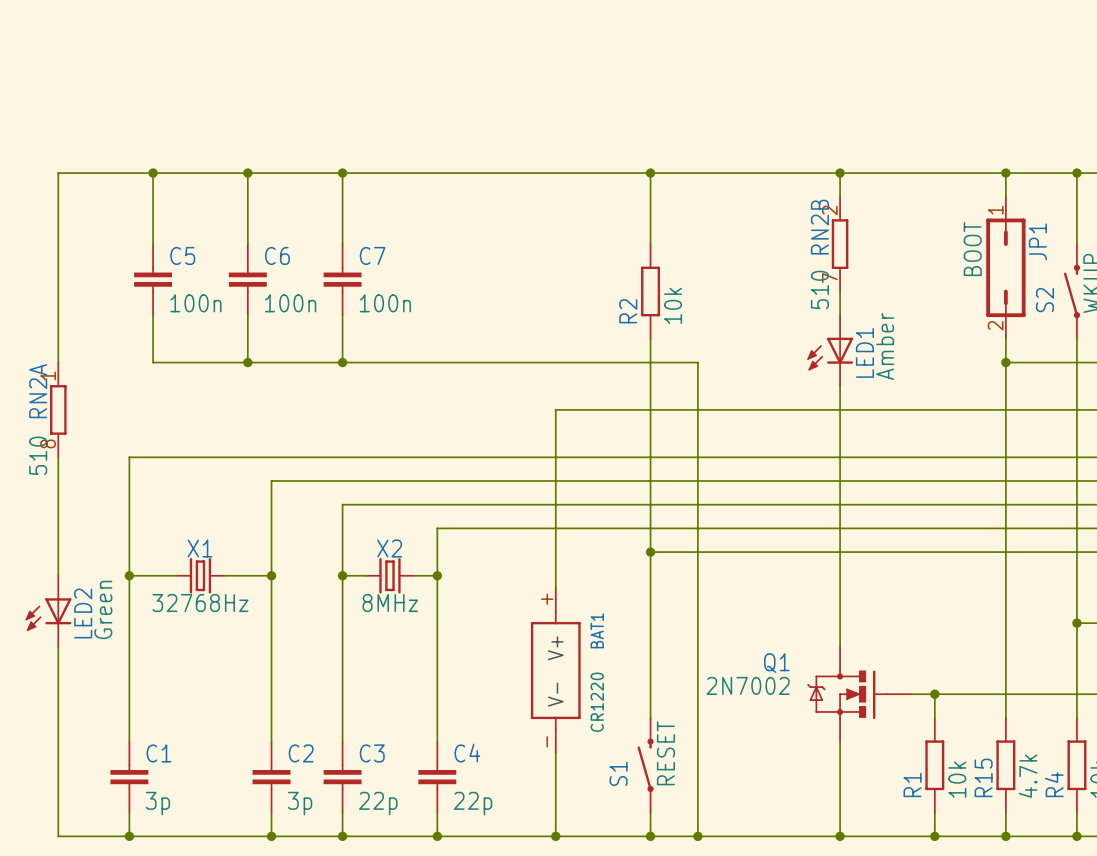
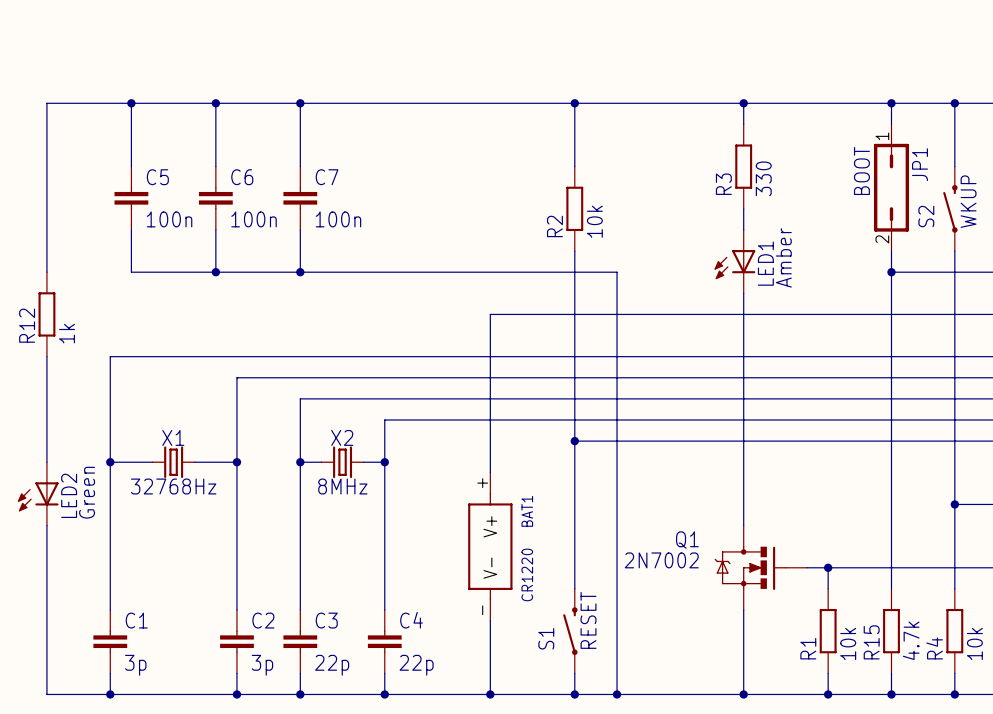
RN2B: 510 (840, 244) -> none
R3: none -> 330 (743, 166)
RN2A: 510 (58, 409) -> none
R12: none -> 1k (46, 314)

